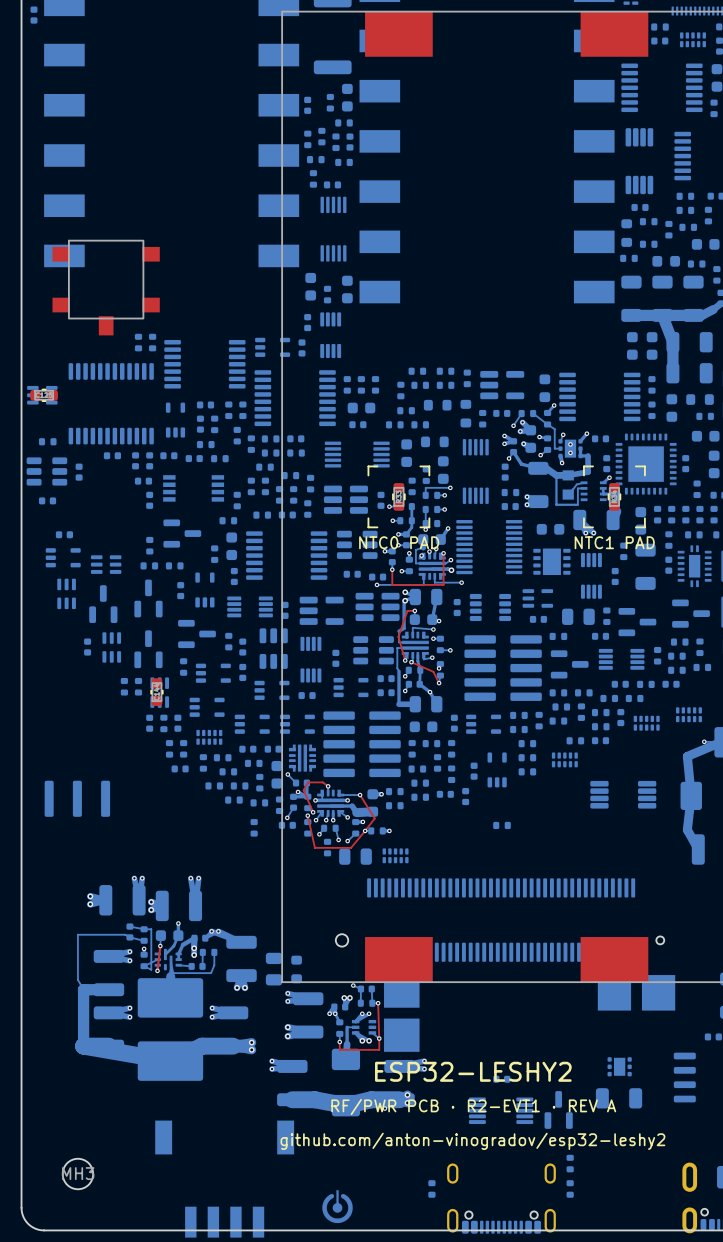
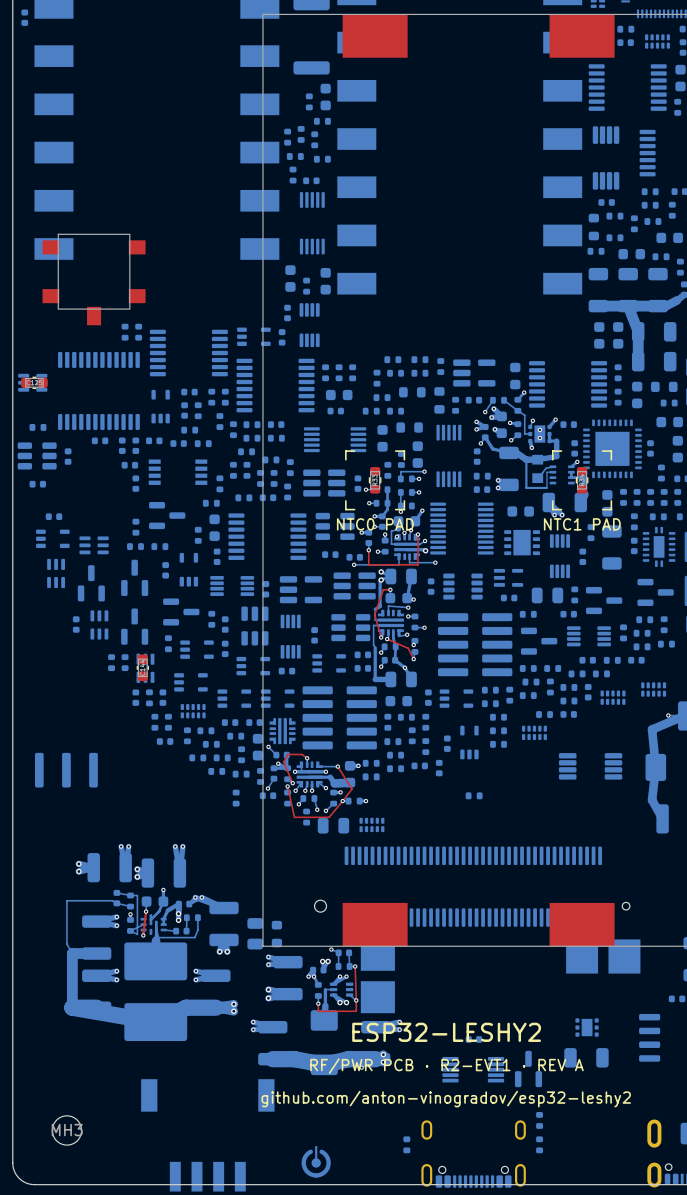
part: (307, 105) -> none
part: (349, 142) -> none

